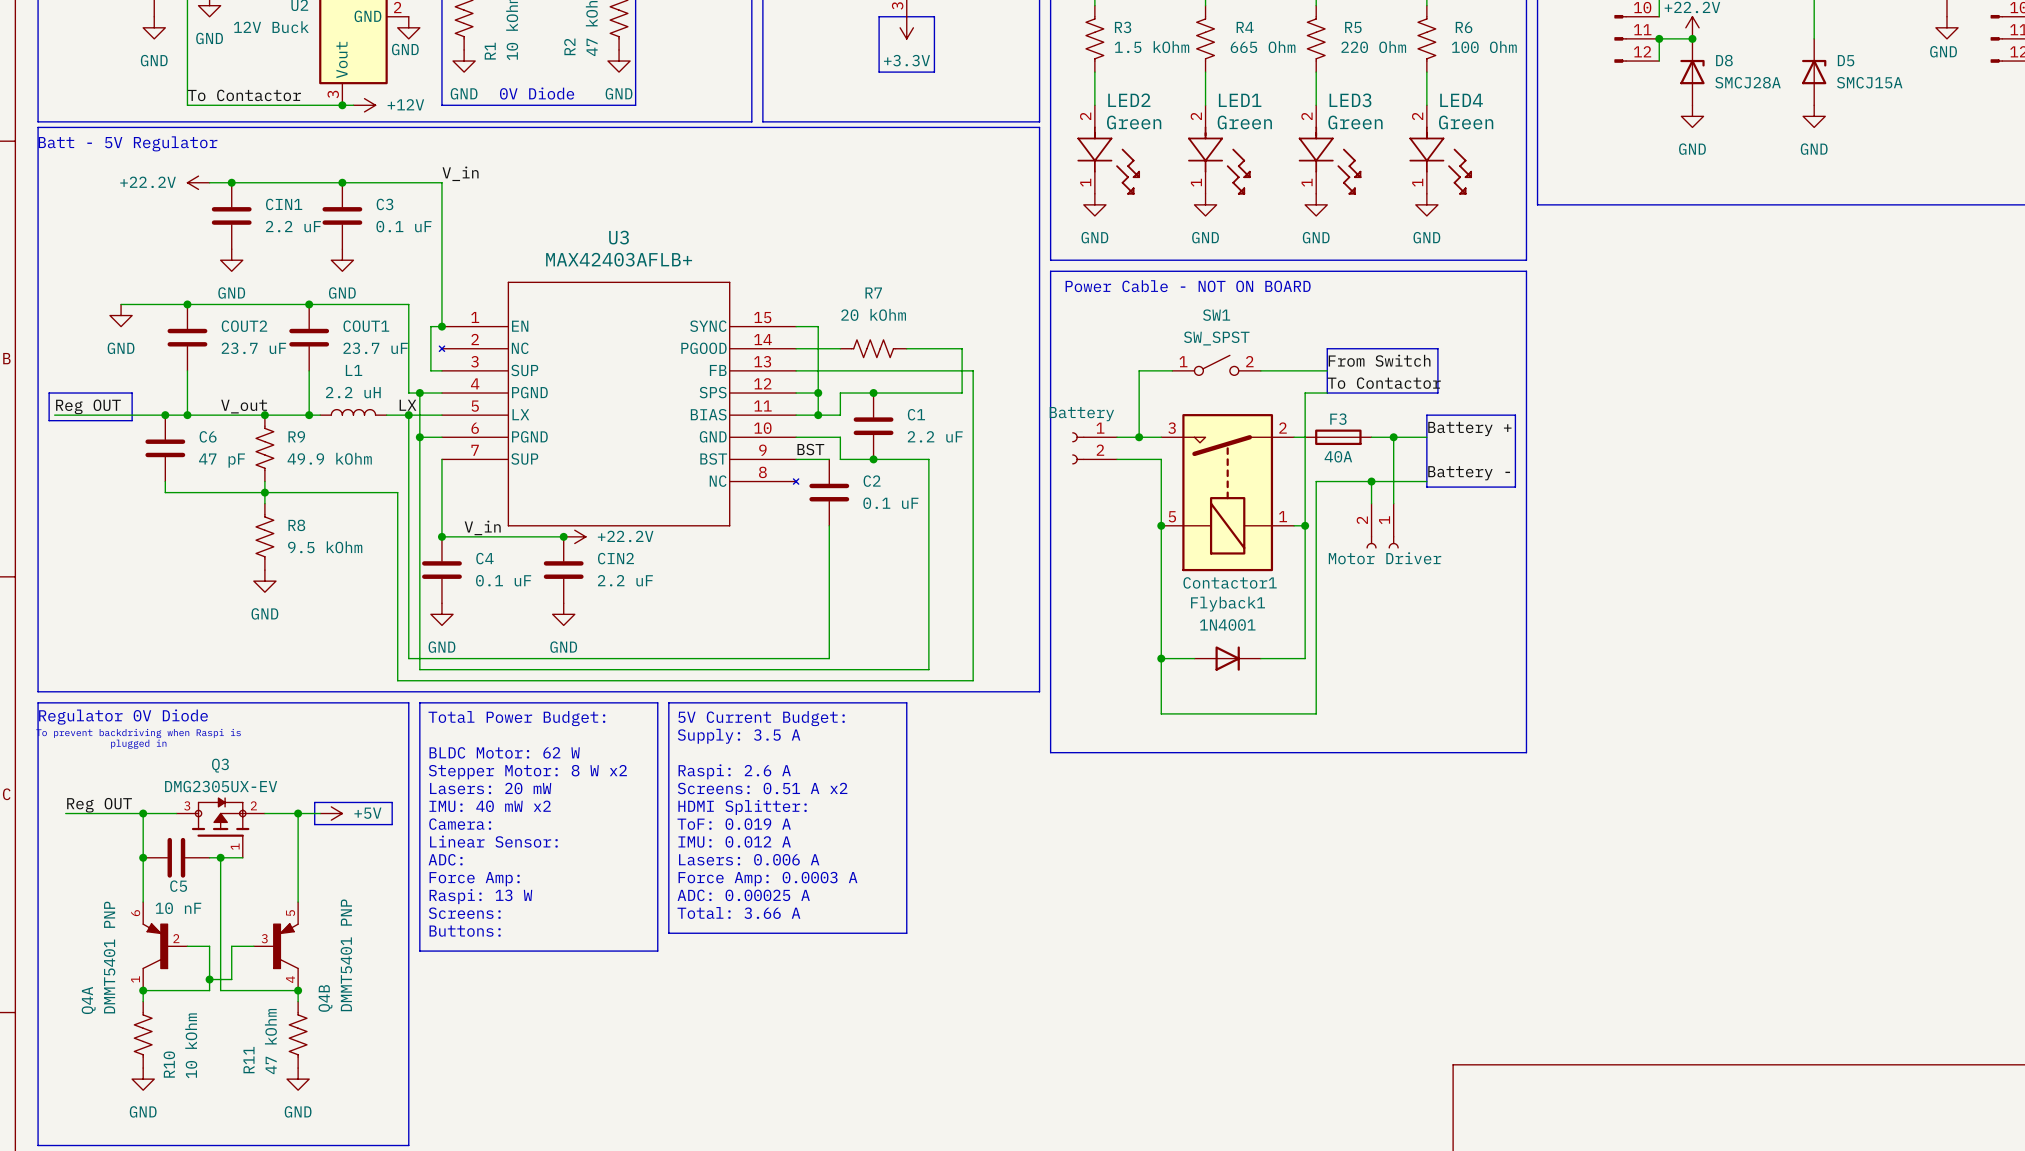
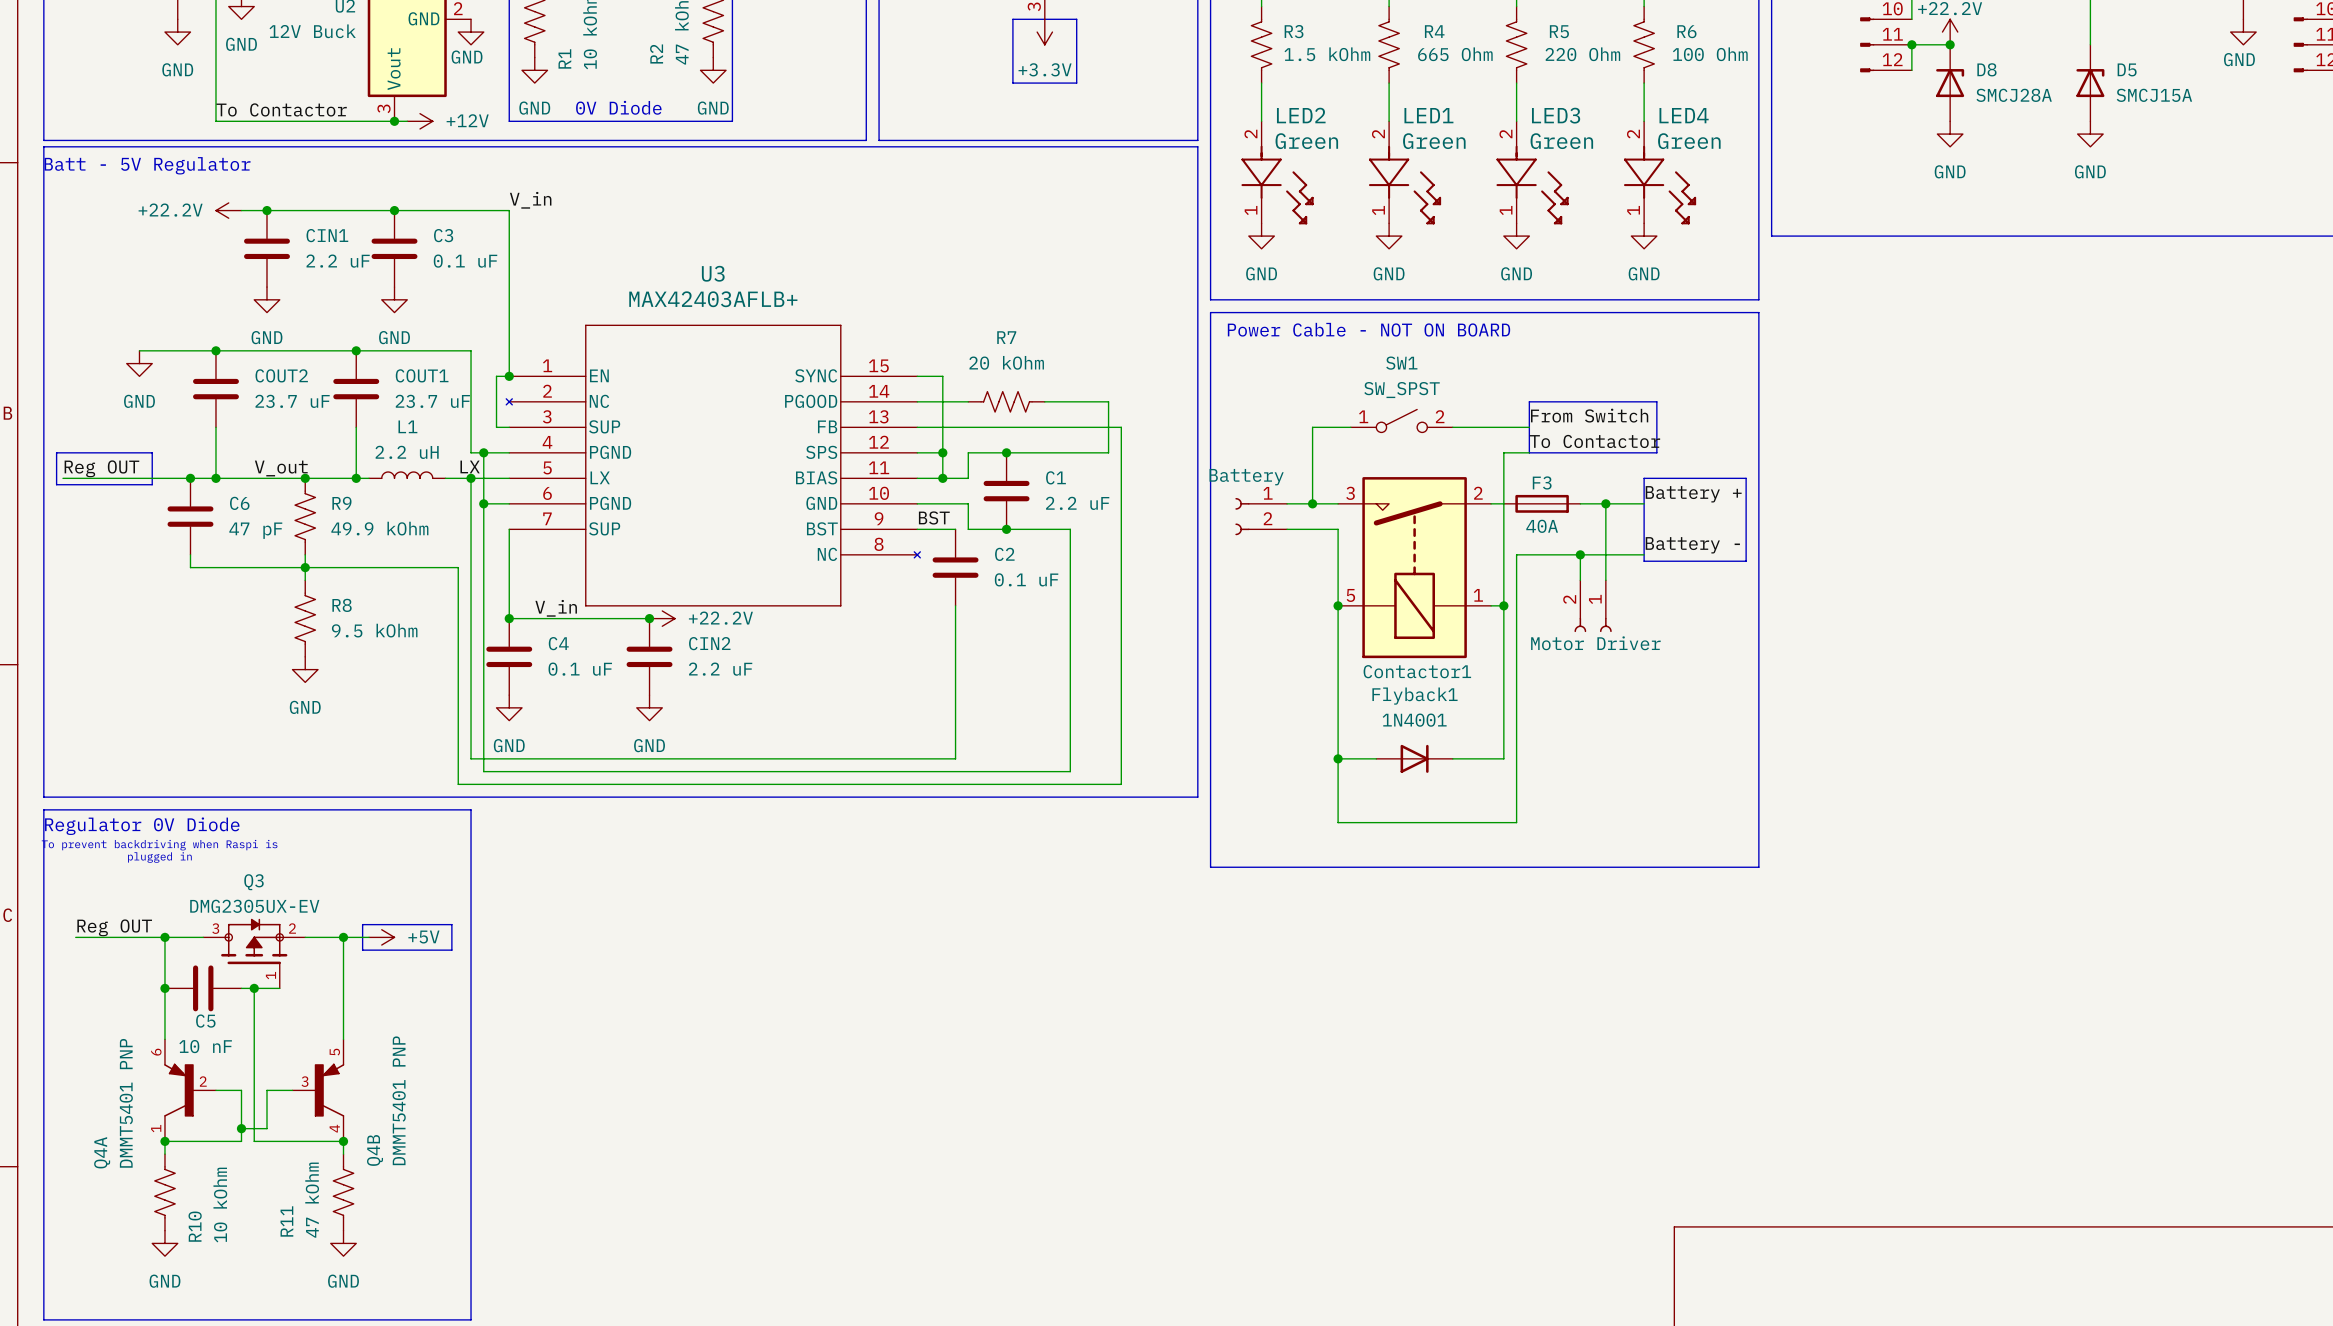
line: (419, 702) (657, 702) (657, 951) (419, 951) (419, 702) -> none
line: (668, 702) (906, 702) (906, 933) (668, 933) (668, 702) -> none
text: Total Power Budget: (516, 718) -> none
text: 5V Current Budget: (761, 718) -> none
text: Supply: 3.5 A (739, 736) -> none
text: BLDC Motor: 62 W (504, 752) -> none
text: Raspi: 2.6 A (734, 771) -> none
text: Stepper Motor: 8 W x2 (527, 772) -> none
text: Lasers: 20 mW (490, 788) -> none
text: Screens: 0.51 A x2 (762, 788) -> none
text: IMU: 40 mW x2 (490, 806) -> none
text: HDMI Splitter: (742, 807) -> none
text: Camera: (460, 824) -> none
text: ToF: 0.019 A (734, 824) -> none
text: Linear Sensor: (493, 841) -> none
text: IMU: 0.012 A (734, 841) -> none
text: ADC: (445, 859) -> none
text: Lasers: 0.006 A (749, 859) -> none
text: Force Amp: (474, 879) -> none
text: Force Amp: 0.0003 A (767, 879) -> none
text: ADC: 0.00025 A (743, 895) -> none
text: Raspi: 13 W (480, 896) -> none
text: Total: 3.66 A (738, 912) -> none
text: Screens: (464, 913) -> none
text: Buttons: (465, 931) -> none

